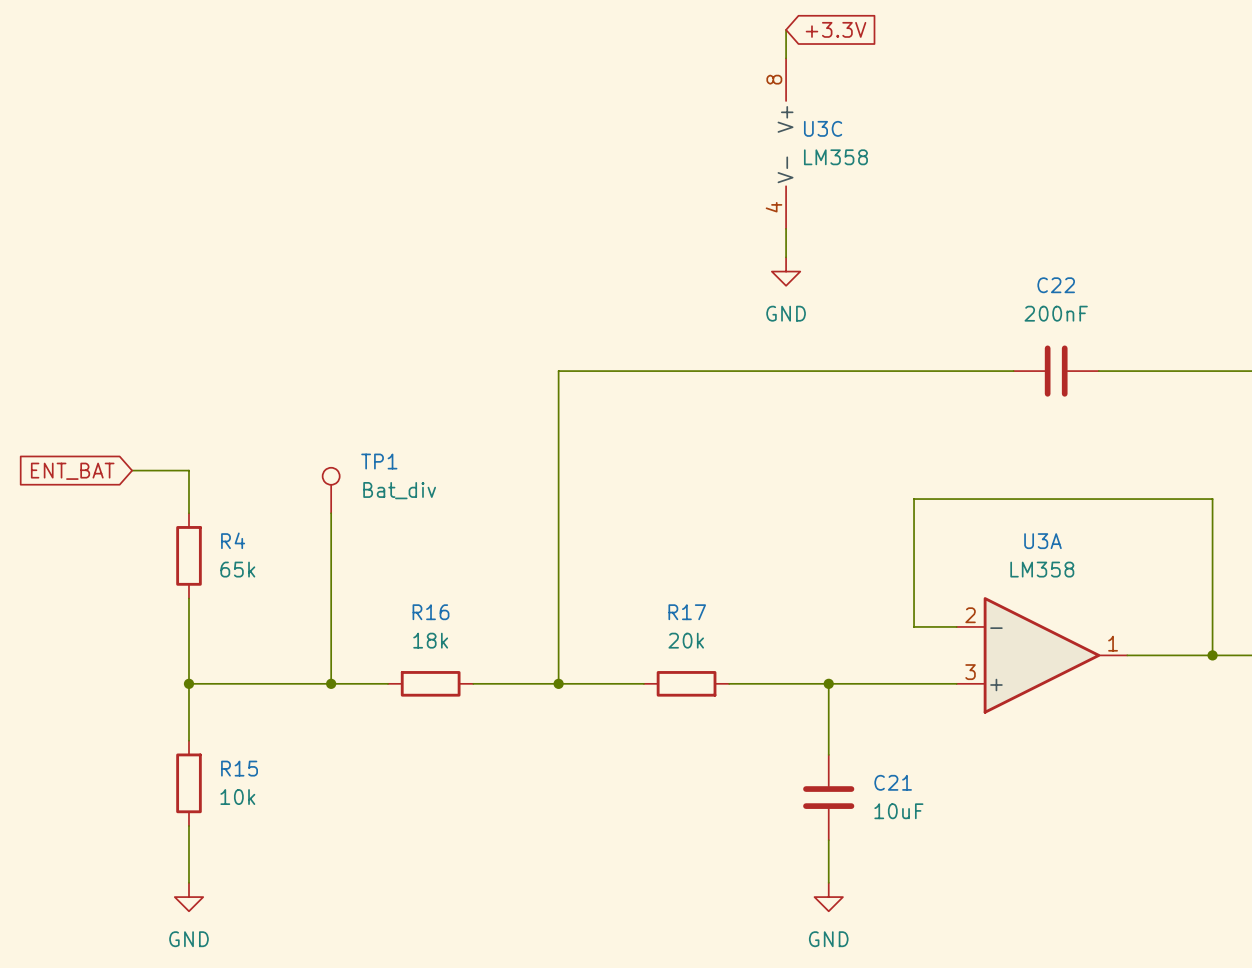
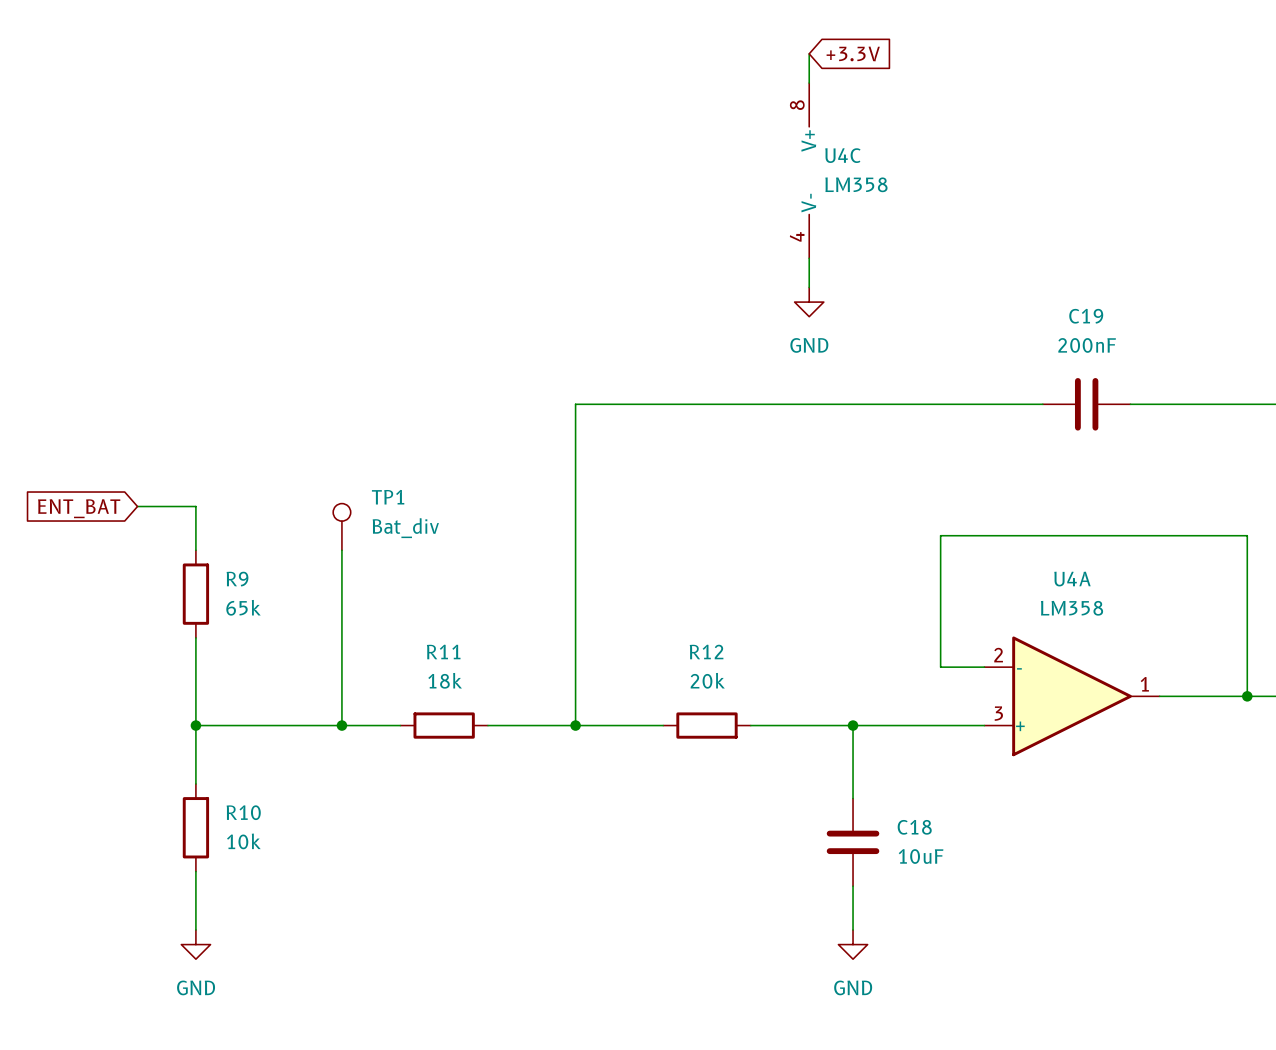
U3C name: U3C (823, 128) -> U4C (842, 155)
C22 name: C22 (1056, 285) -> C19 (1086, 316)
R4 name: R4 (233, 540) -> R9 (237, 579)
U3A name: U3A (1042, 541) -> U4A (1072, 579)
R16 name: R16 (431, 612) -> R11 (443, 651)
R17 name: R17 (687, 612) -> R12 (706, 651)
R15 name: R15 (239, 768) -> R10 (243, 812)
C21 name: C21 (893, 782) -> C18 (914, 827)

